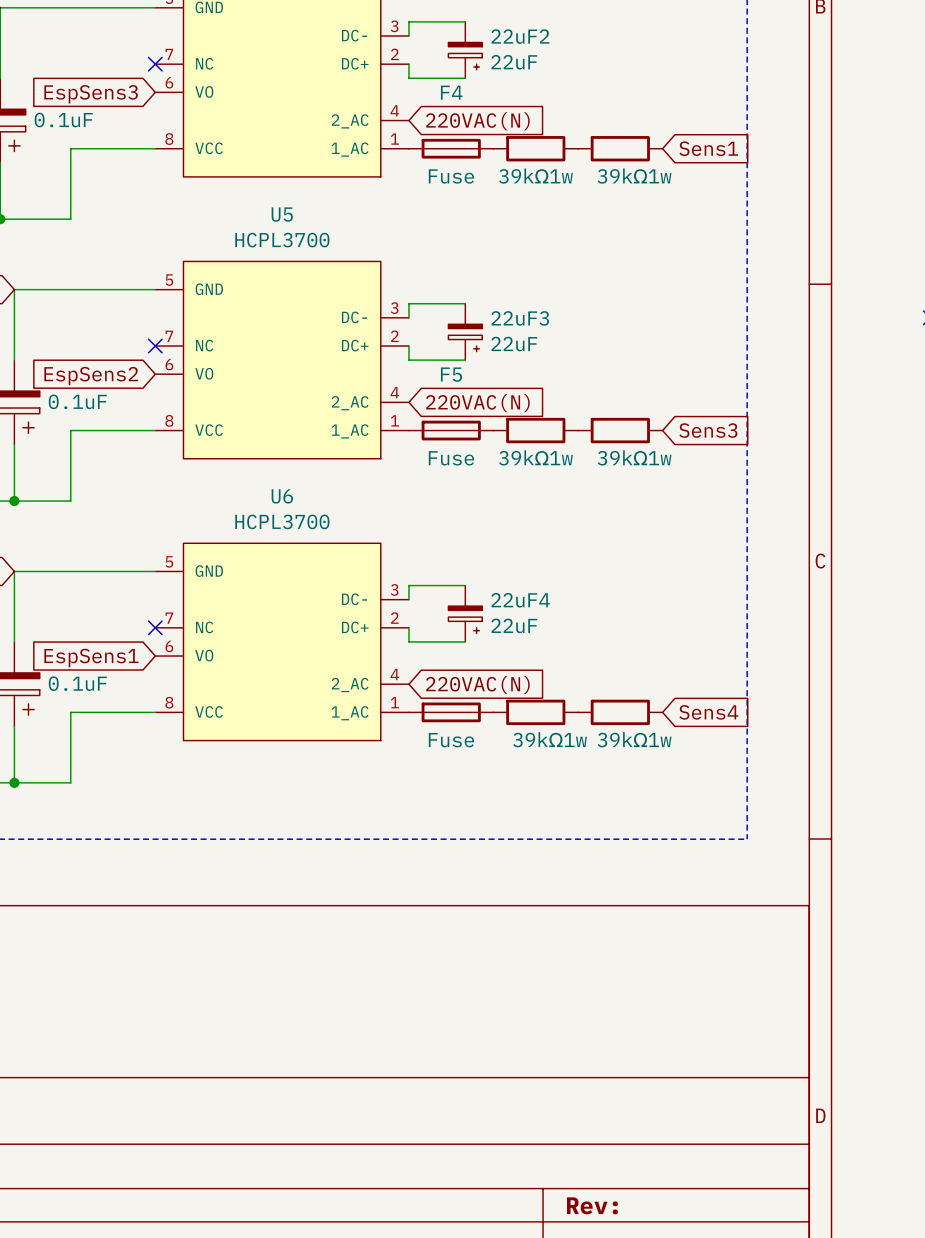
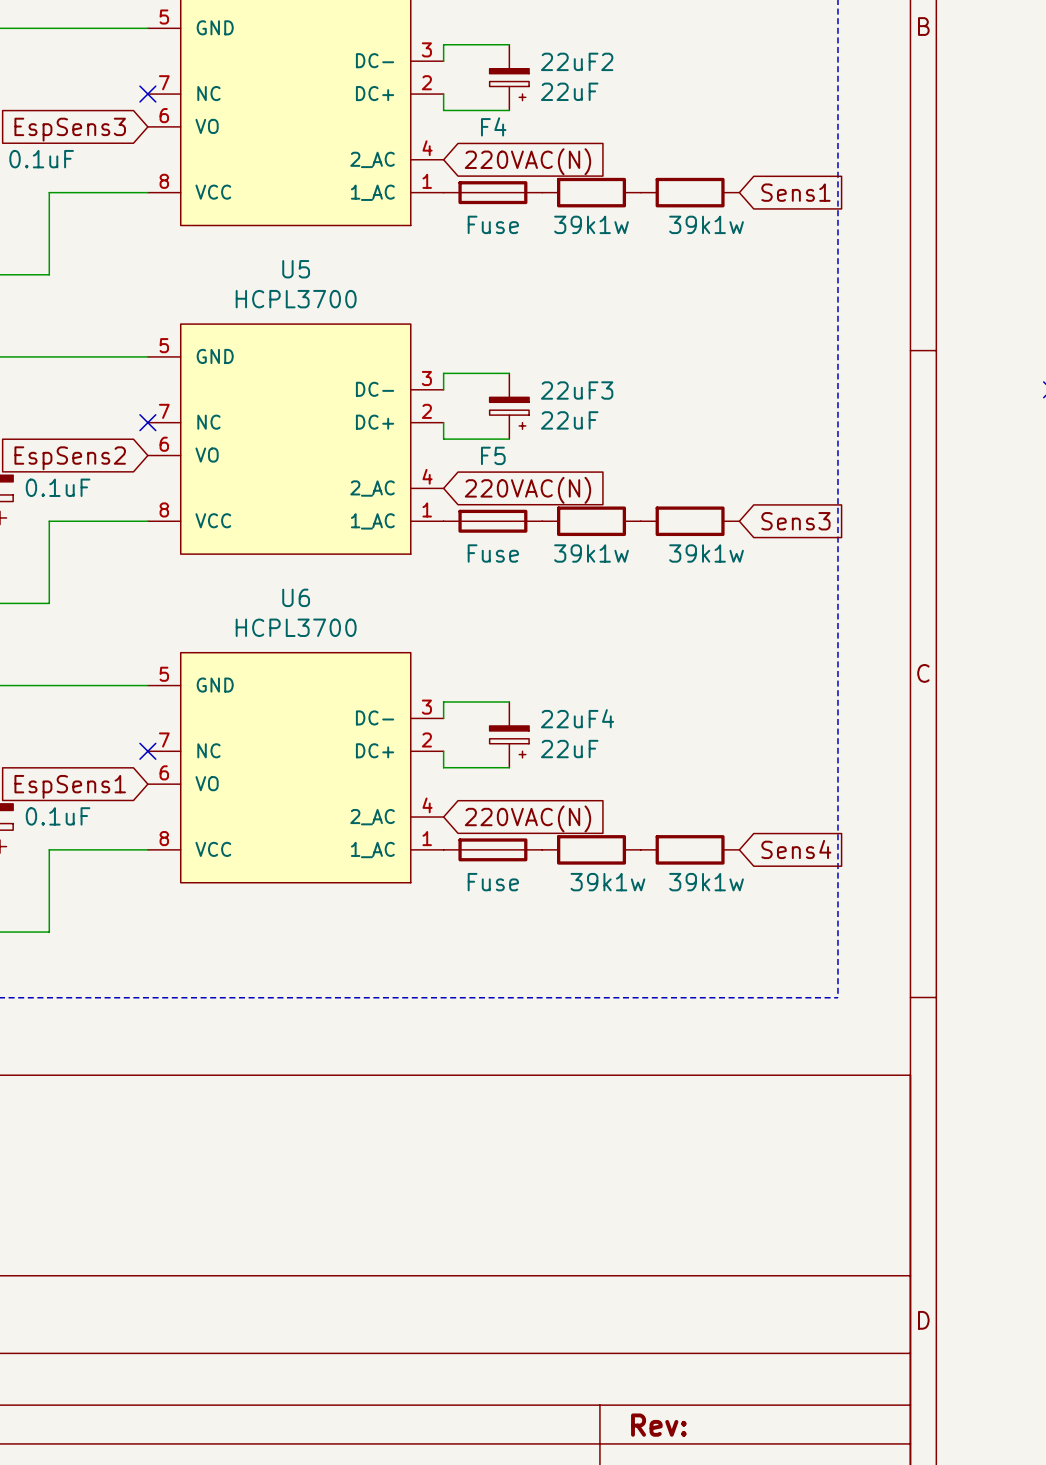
part value: 39kΩ1w (535, 176) -> 39k1w (591, 224)
part value: 39kΩ1w (634, 176) -> 39k1w (706, 224)
part value: 39kΩ1w (535, 457) -> 39k1w (591, 553)
part value: 39kΩ1w (634, 457) -> 39k1w (706, 553)
part value: 39kΩ1w (550, 739) -> 39k1w (607, 882)
part value: 39kΩ1w (634, 739) -> 39k1w (706, 882)

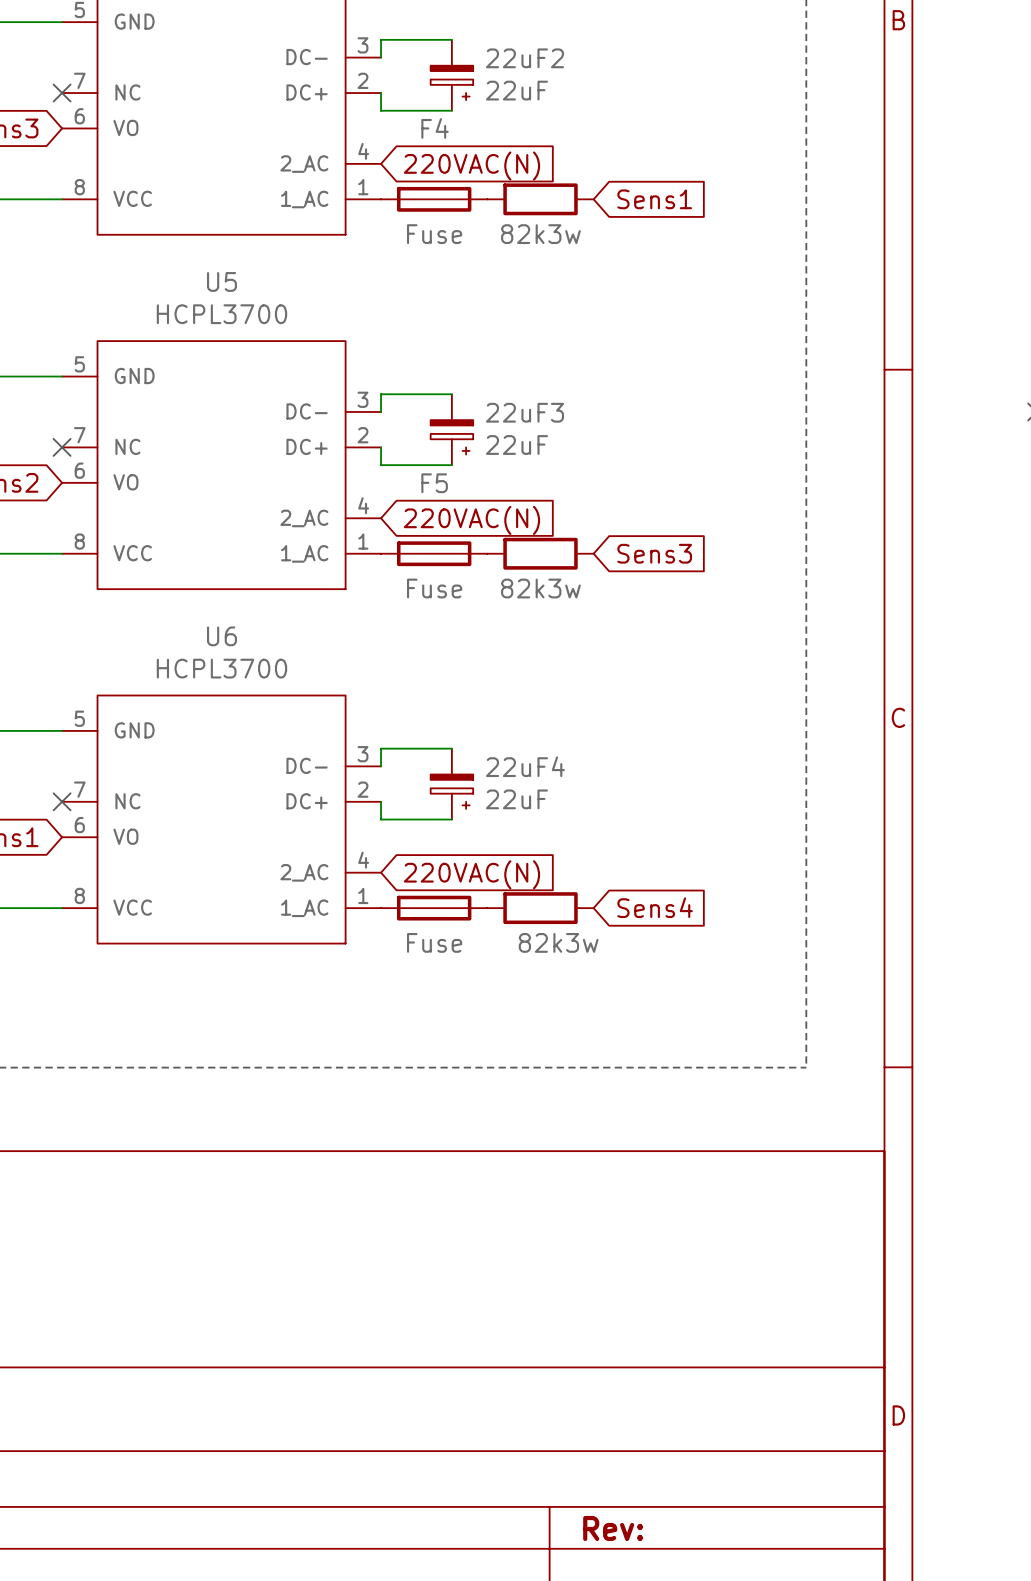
part: 39k1w (690, 192) -> none
global label position: Sens1 (795, 192) -> Sens1 (654, 199)
part value: 39k1w (591, 224) -> 82k3w (540, 234)
part: 39k1w (690, 521) -> none
global label position: Sens3 (795, 521) -> Sens3 (654, 553)
part value: 39k1w (591, 553) -> 82k3w (540, 588)
part: 39k1w (690, 849) -> none
global label position: Sens4 (796, 849) -> Sens4 (655, 907)
part value: 39k1w (607, 882) -> 82k3w (558, 942)

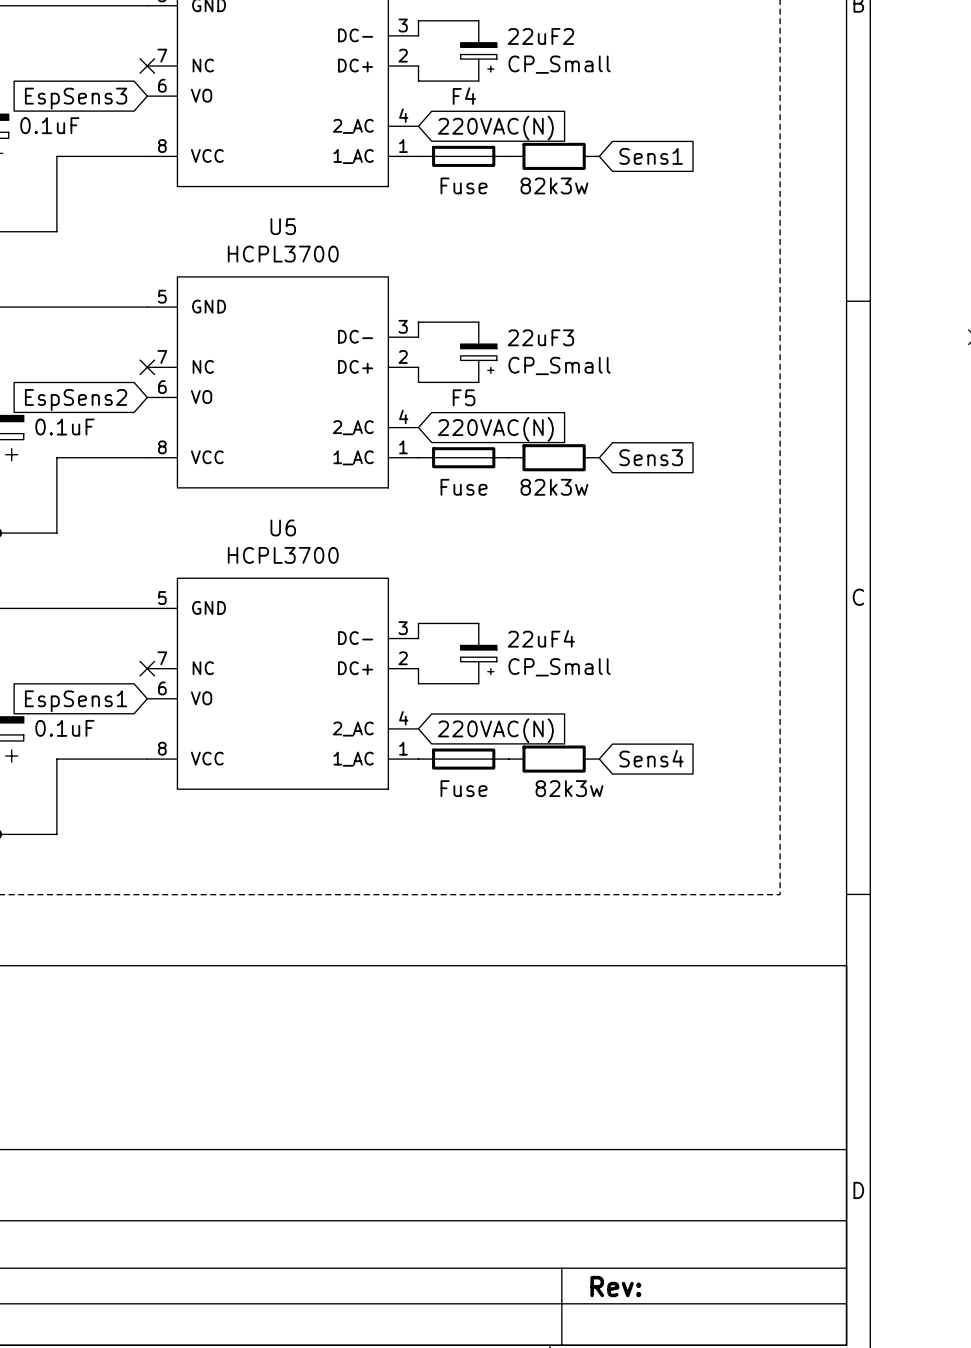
22uF2 value: 22uF (516, 90) -> CP_Small (559, 64)
22uF3 value: 22uF (516, 444) -> CP_Small (559, 365)
22uF4 value: 22uF (516, 799) -> CP_Small (559, 667)

